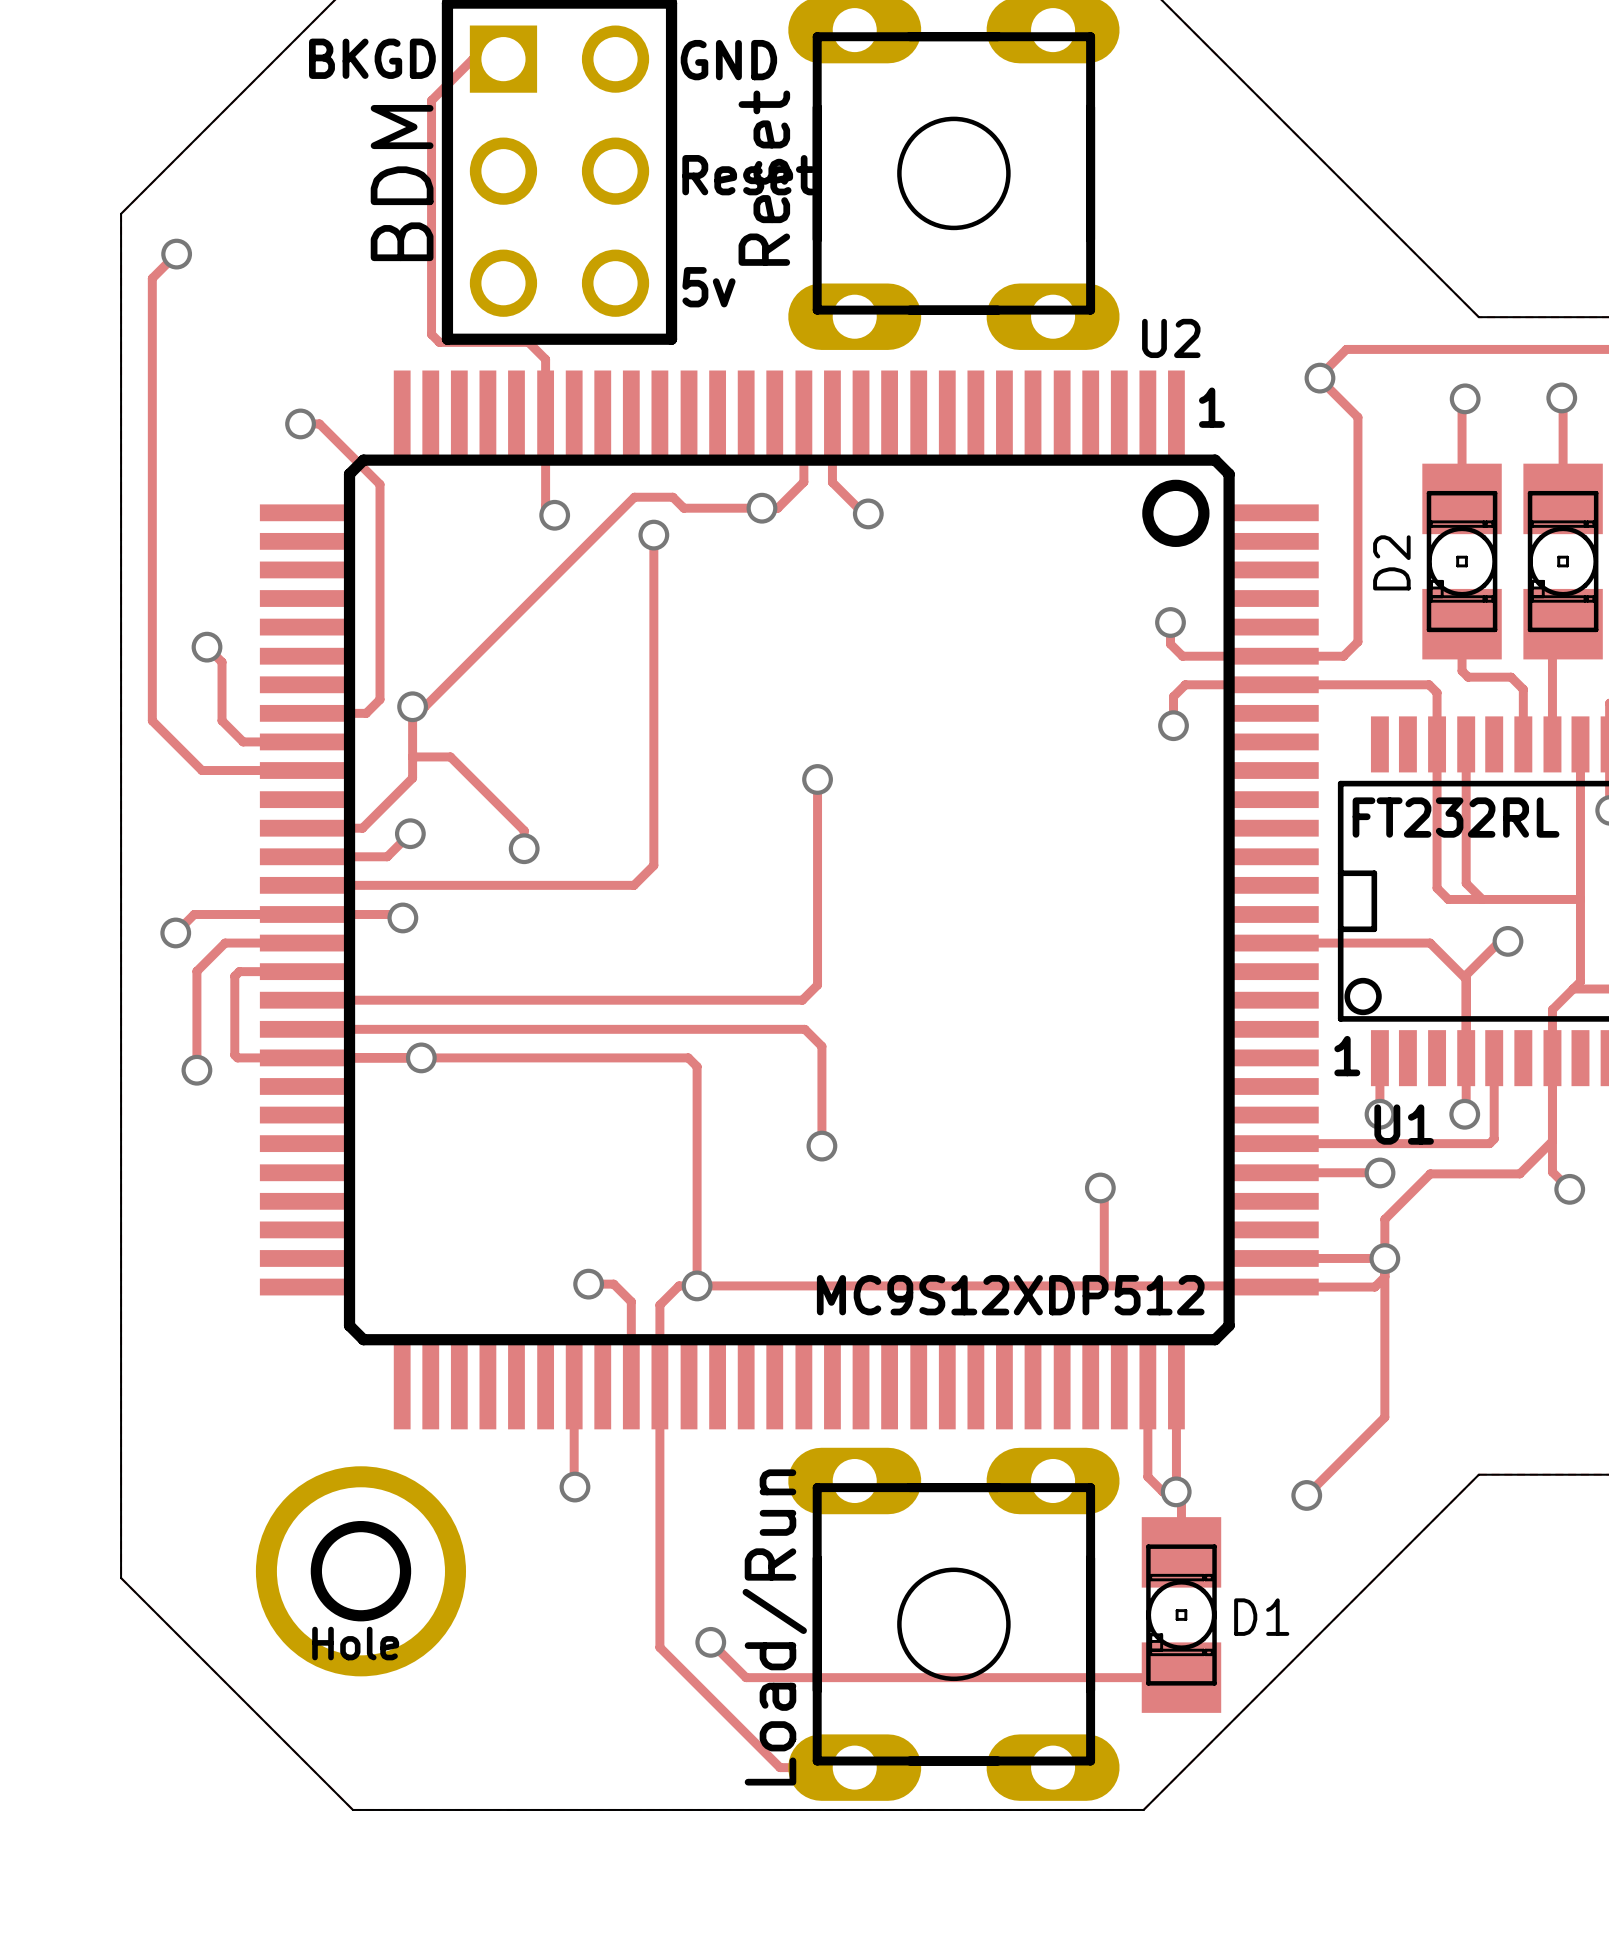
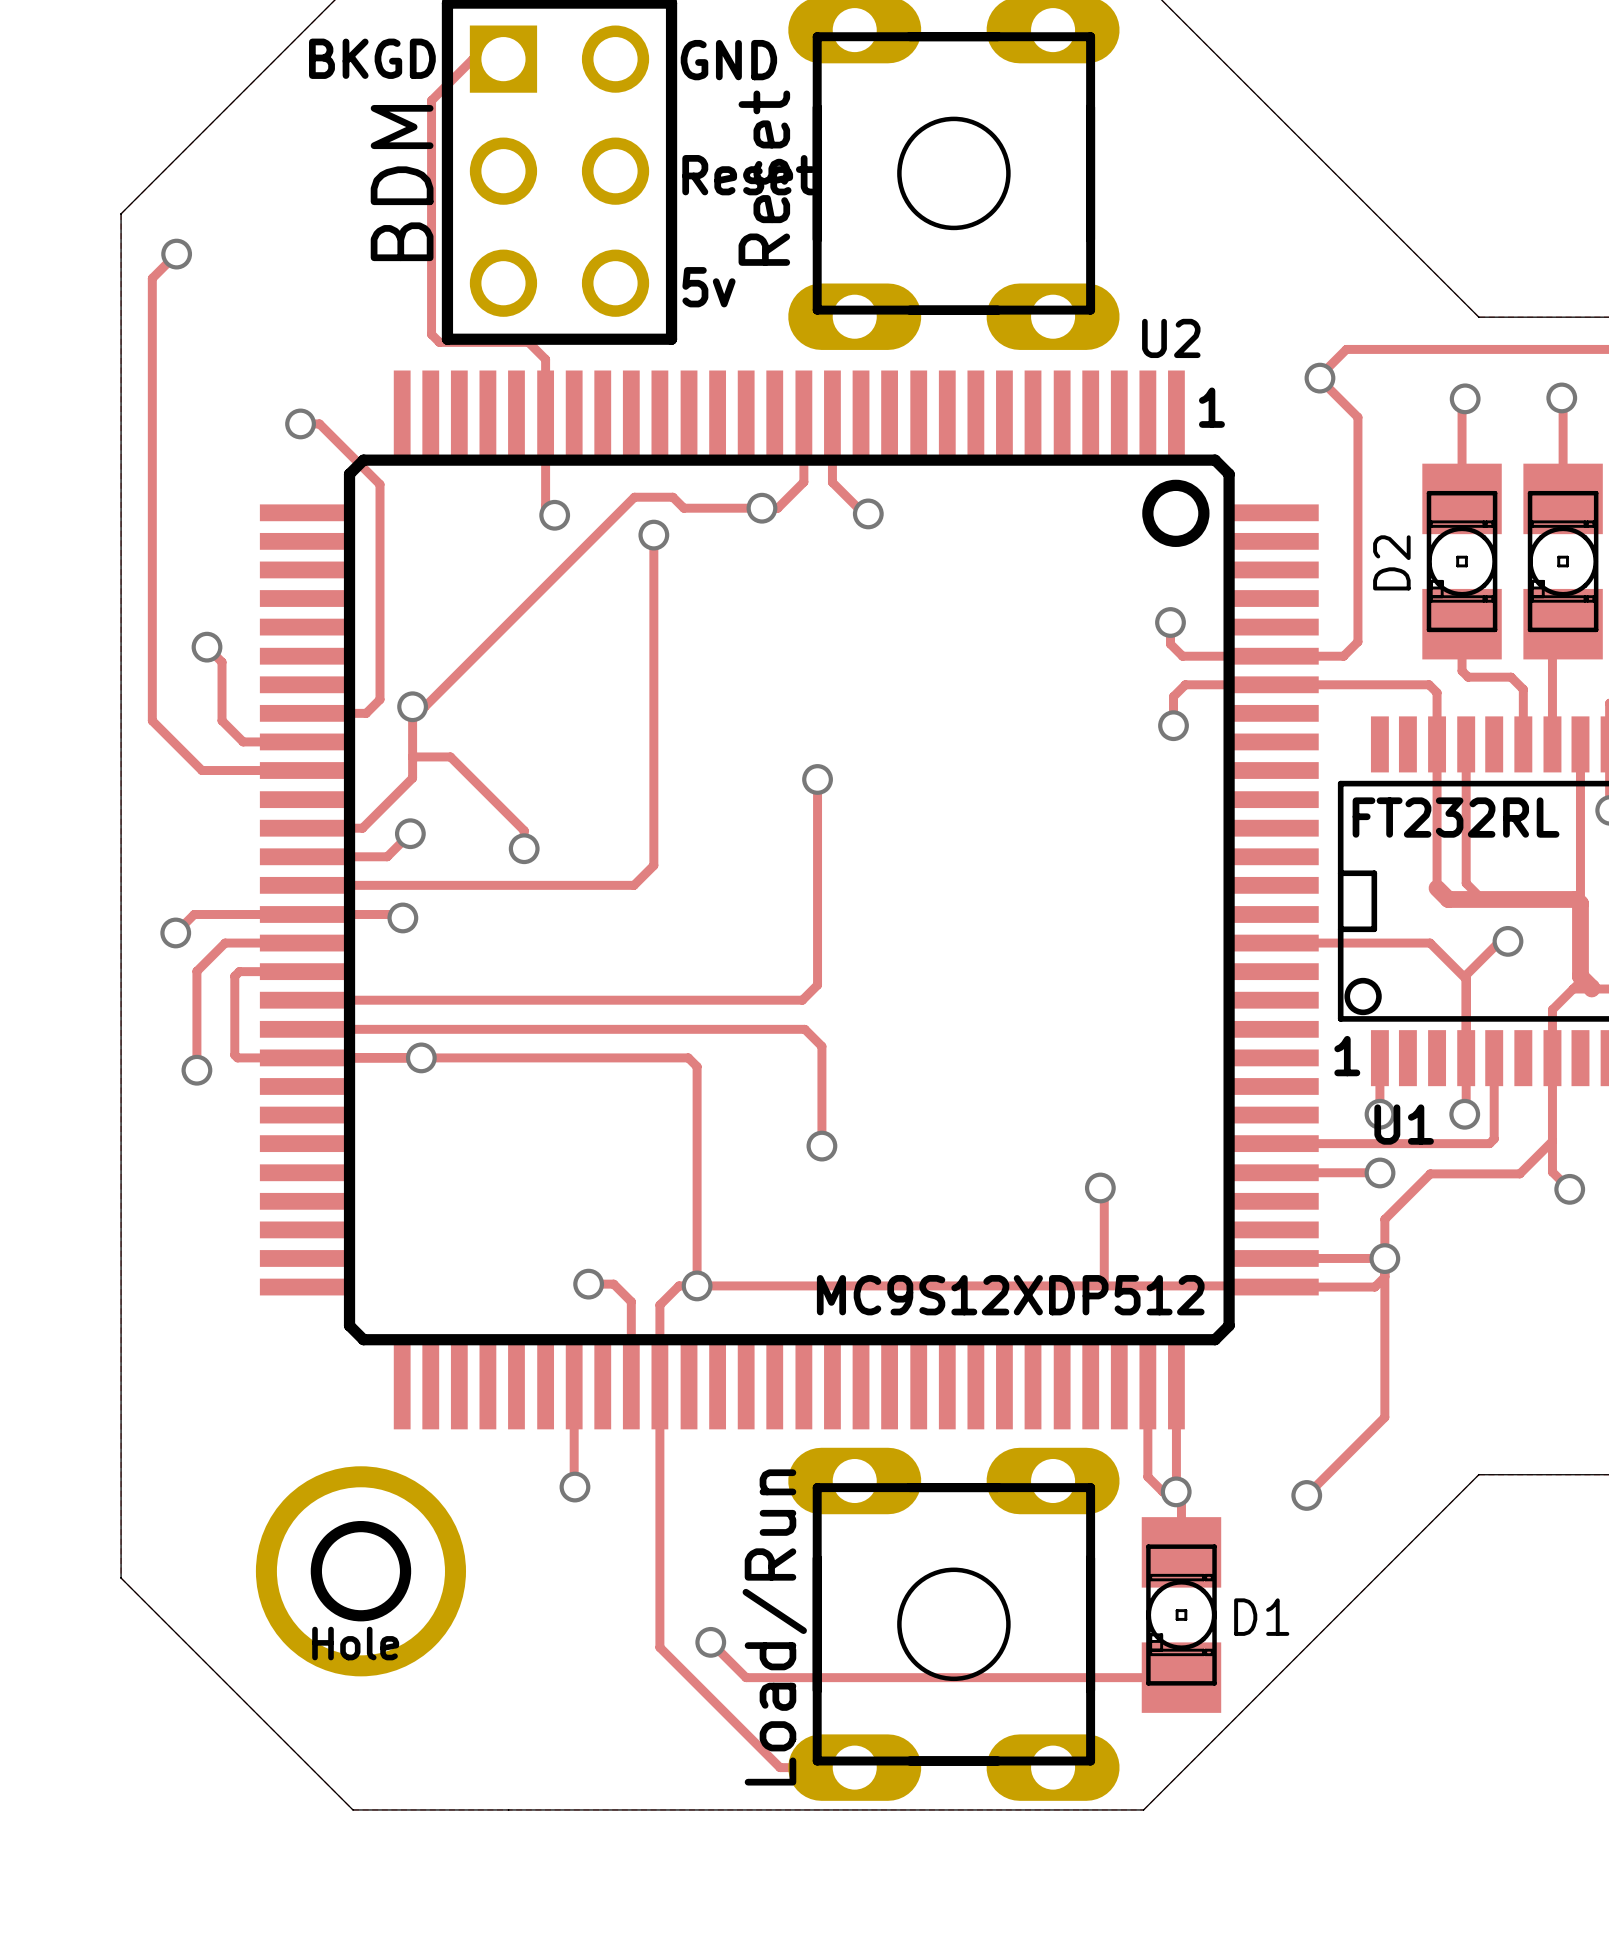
track: none -> (1437, 888) (1448, 899) (1576, 899) (1580, 903) (1580, 976) (1591, 989)

